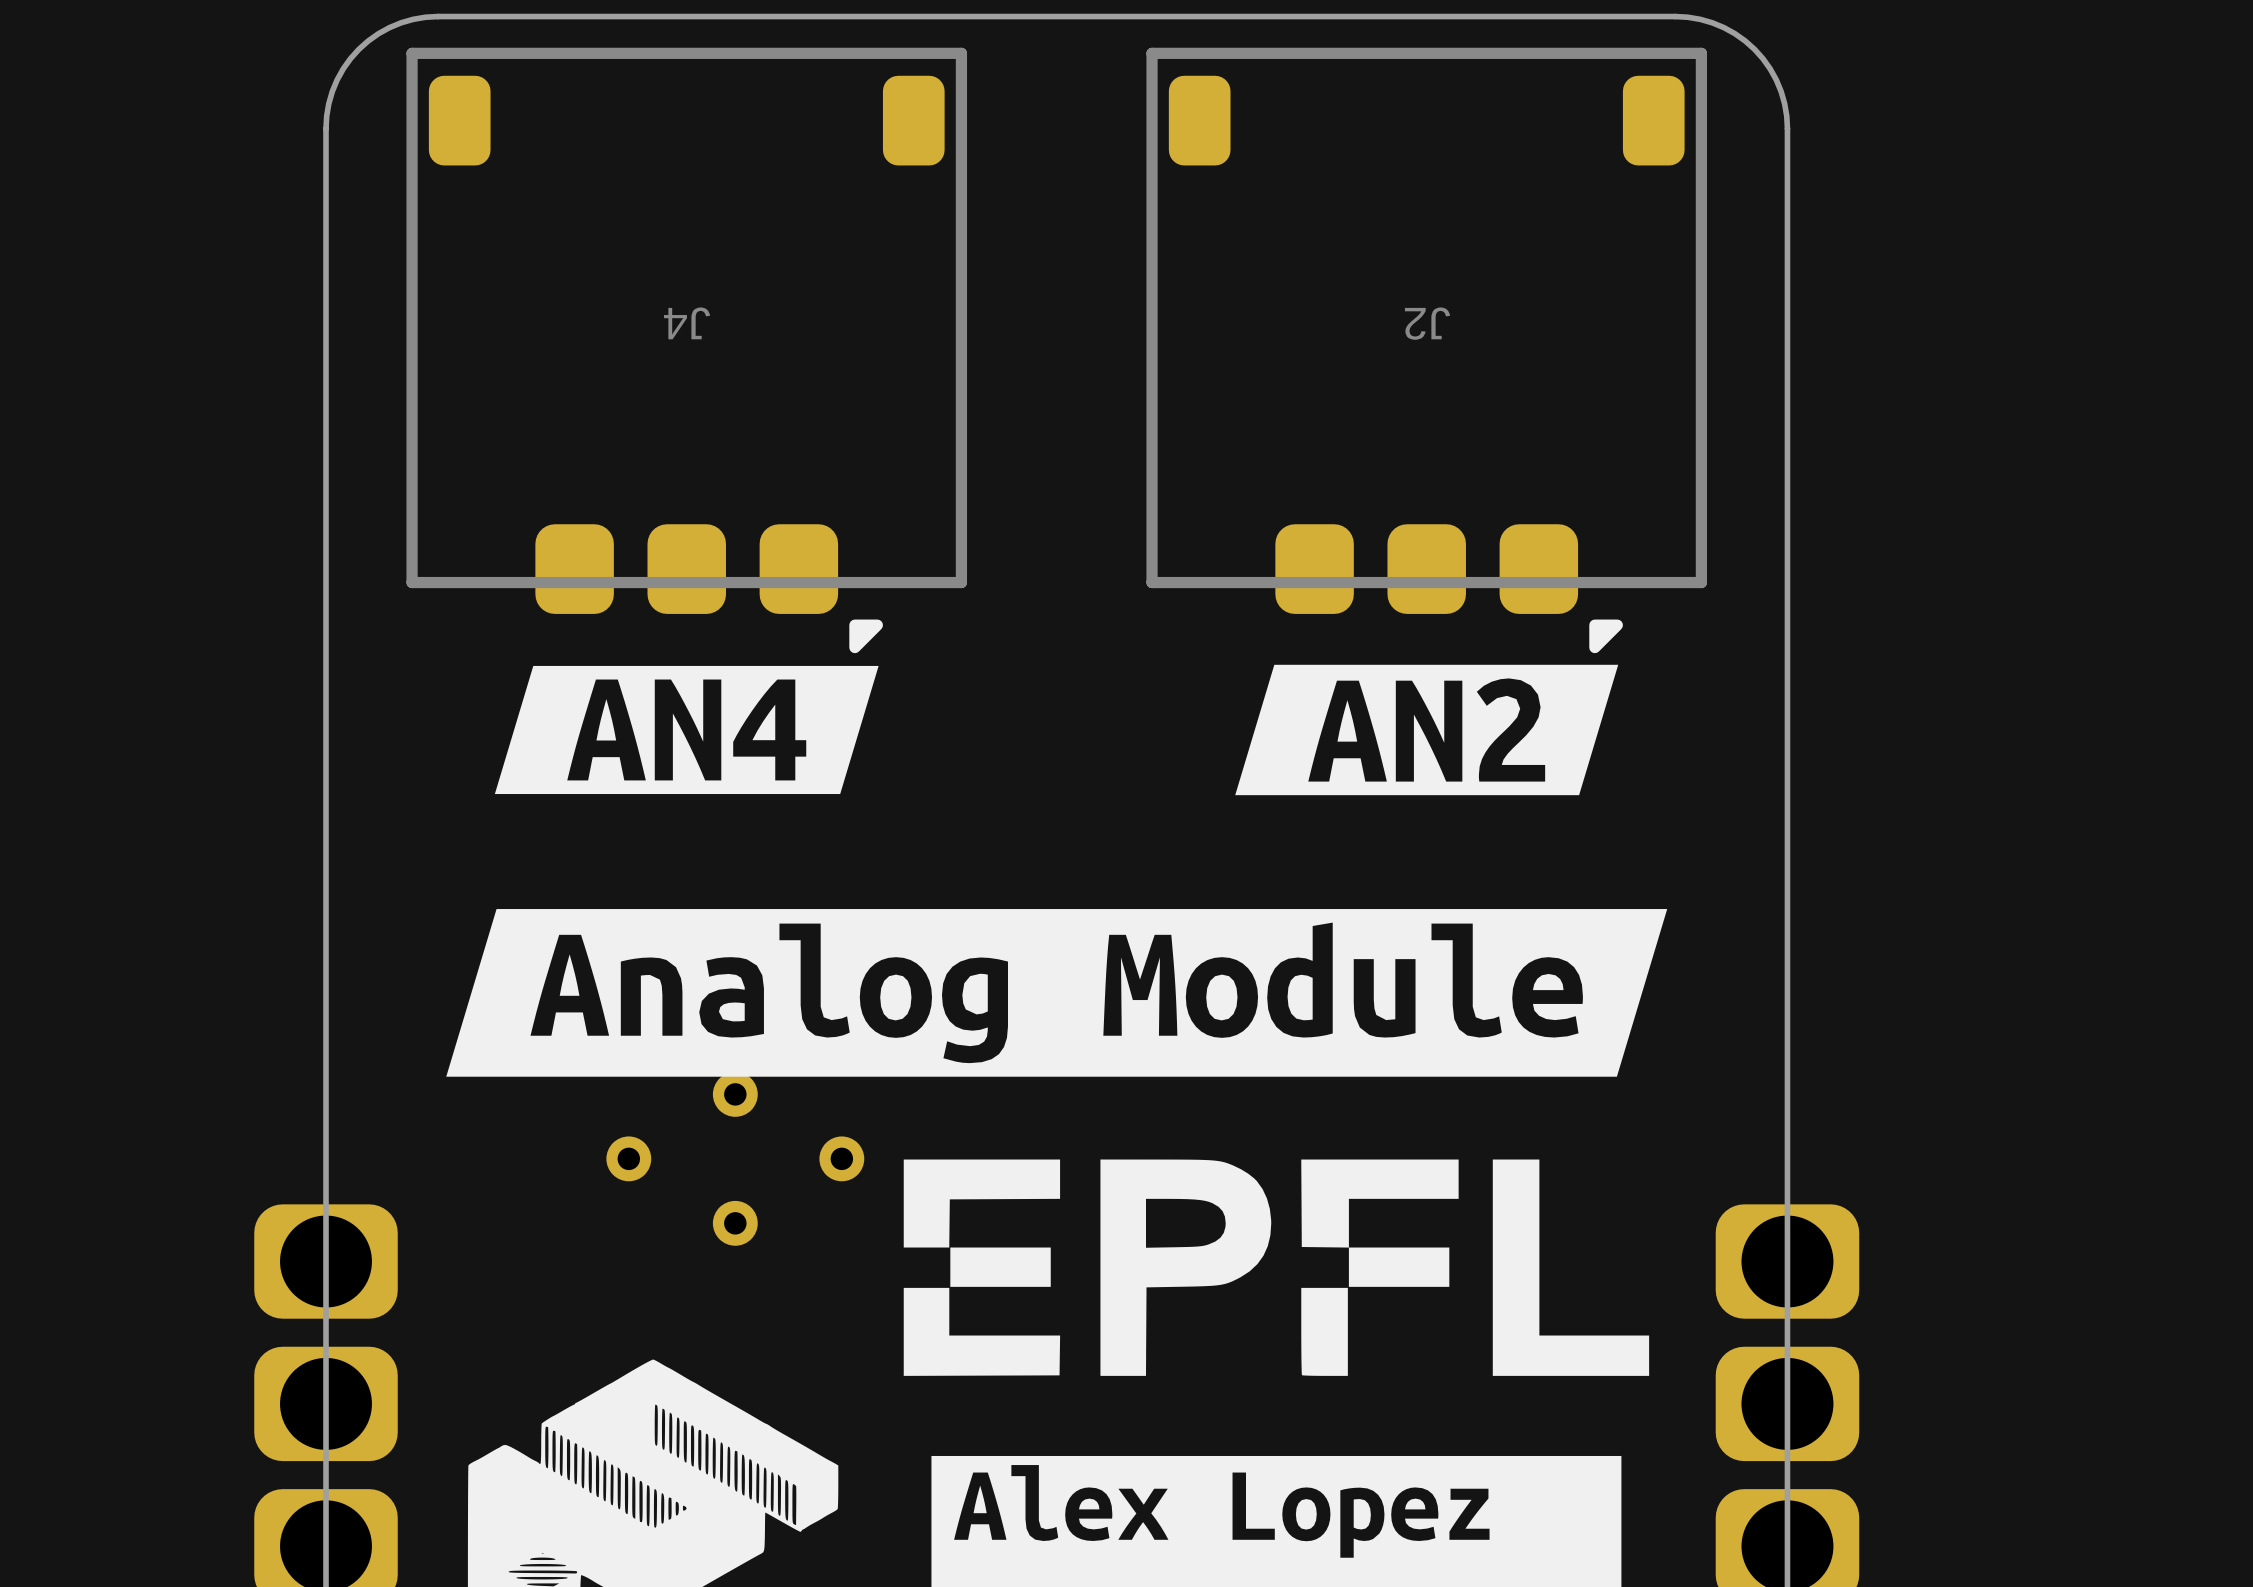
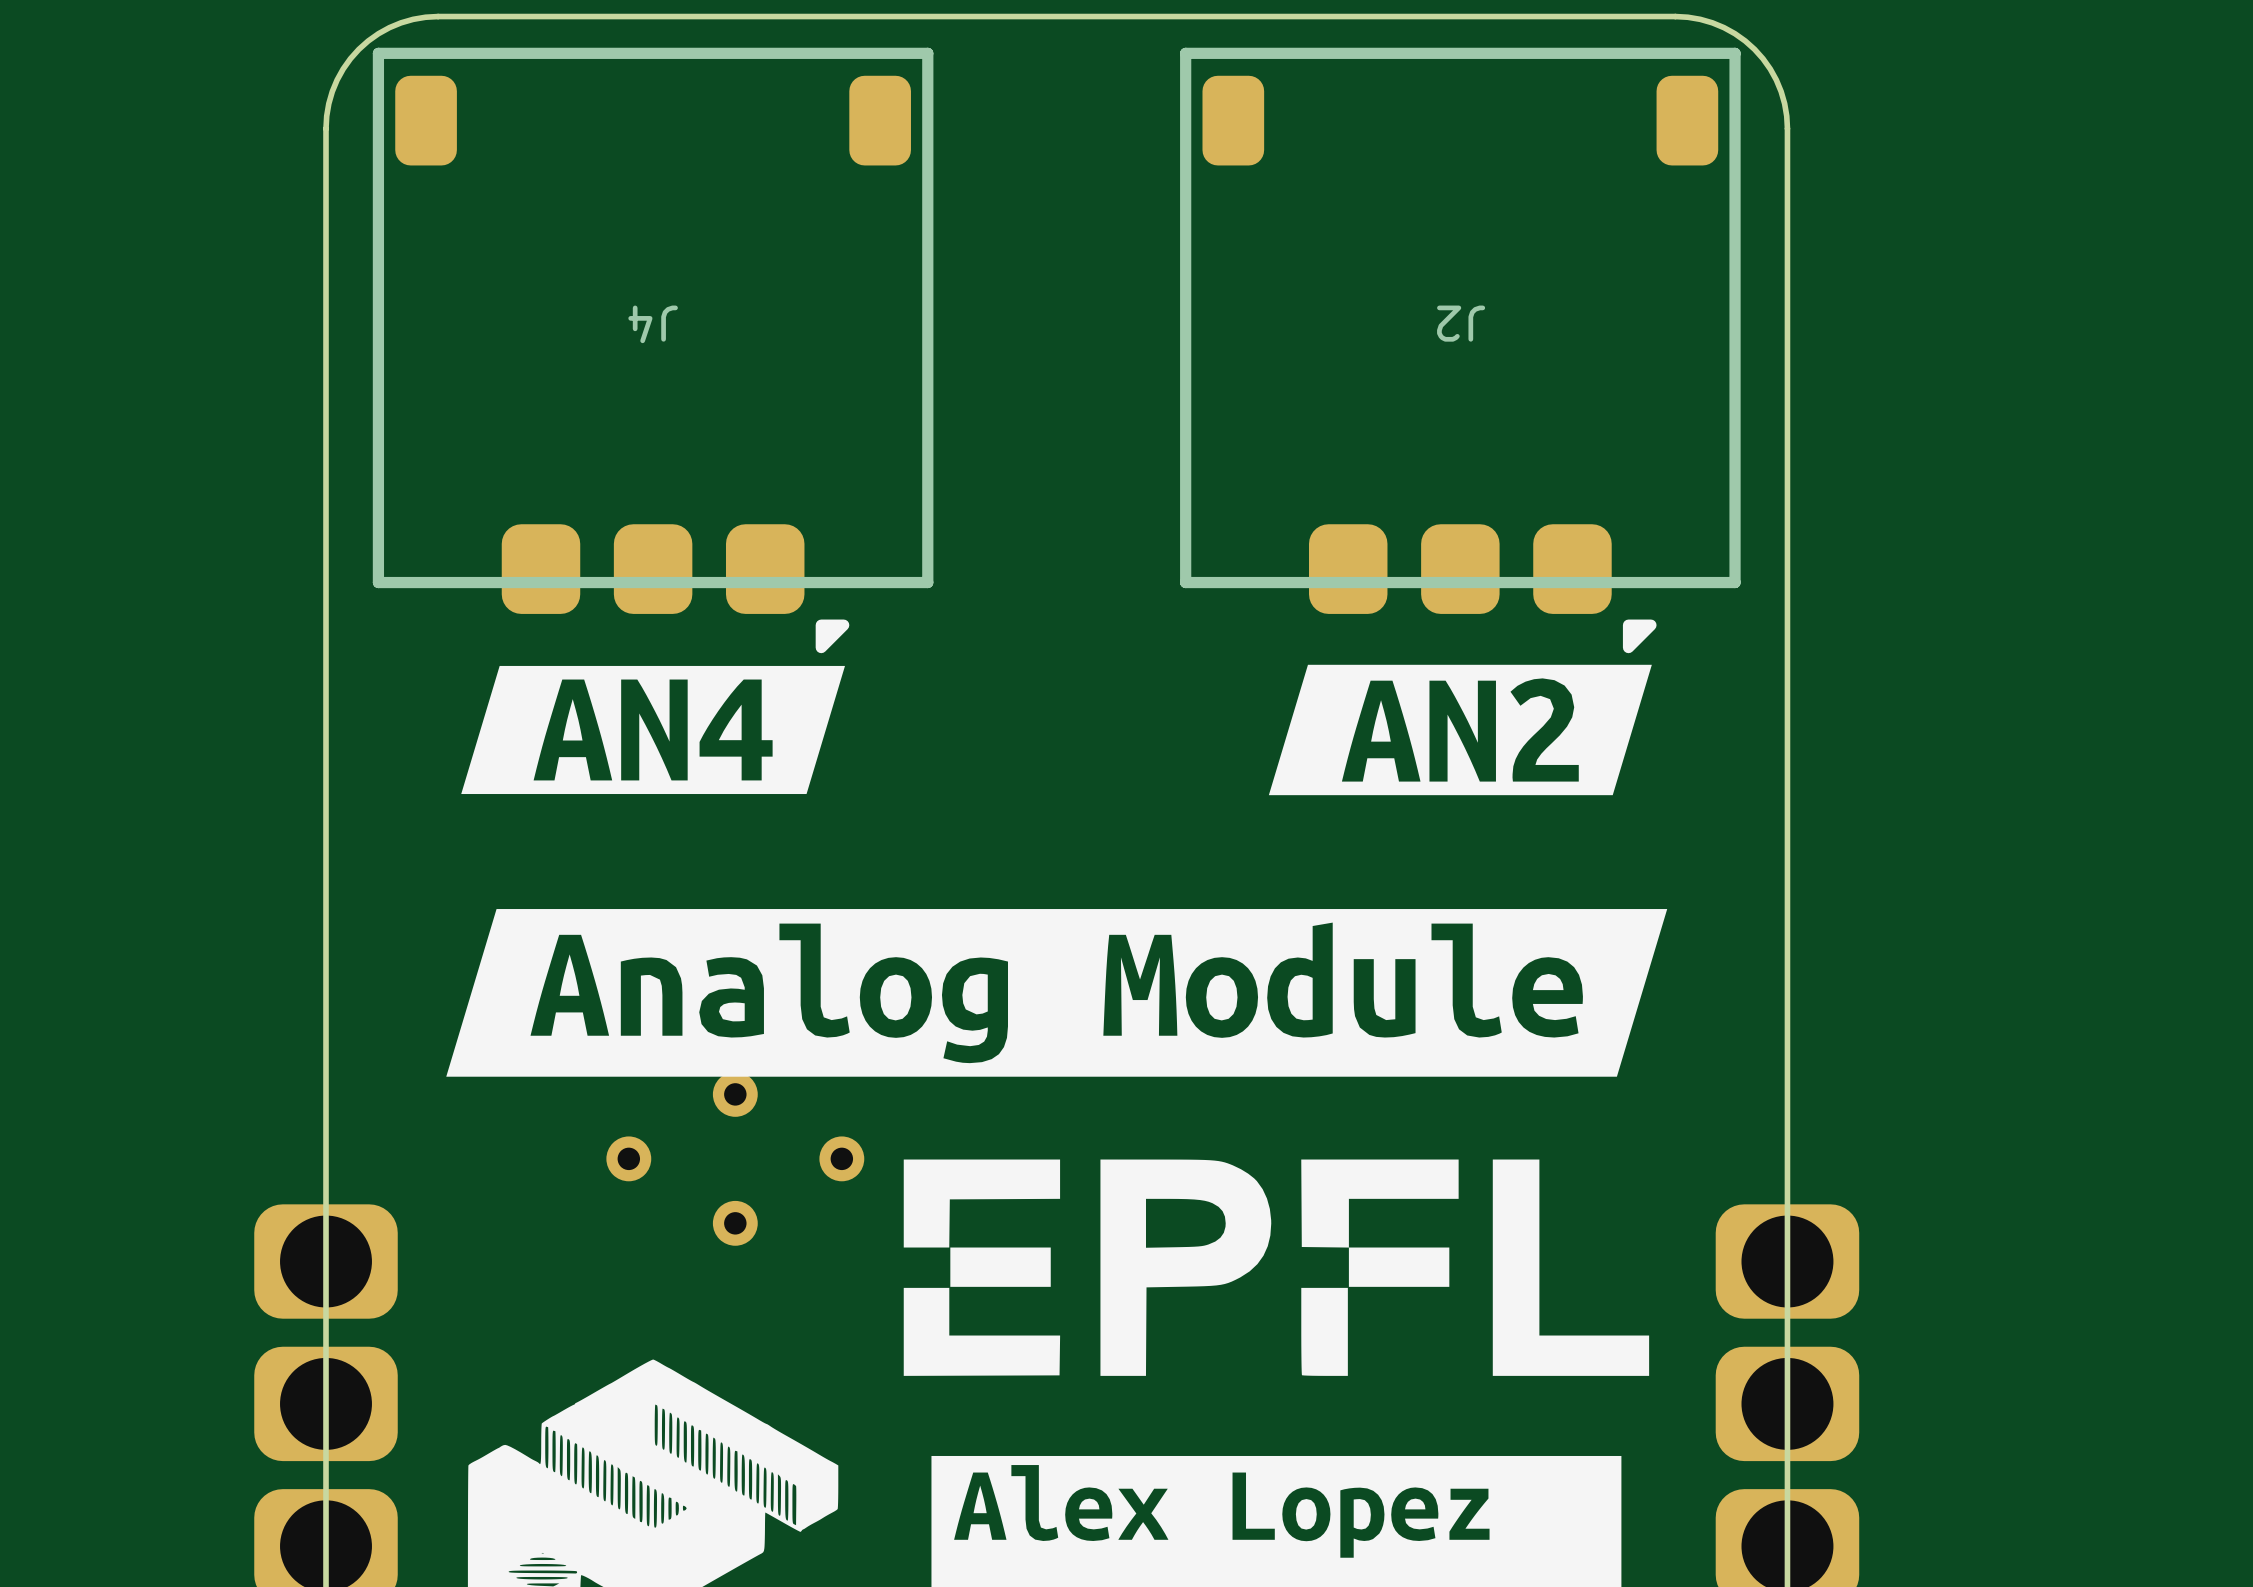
J4 position: (686, 350) -> (653, 350)
J2 position: (1426, 350) -> (1460, 350)
drawing position: (686, 729) -> (653, 729)
drawing position: (1426, 729) -> (1460, 729)

